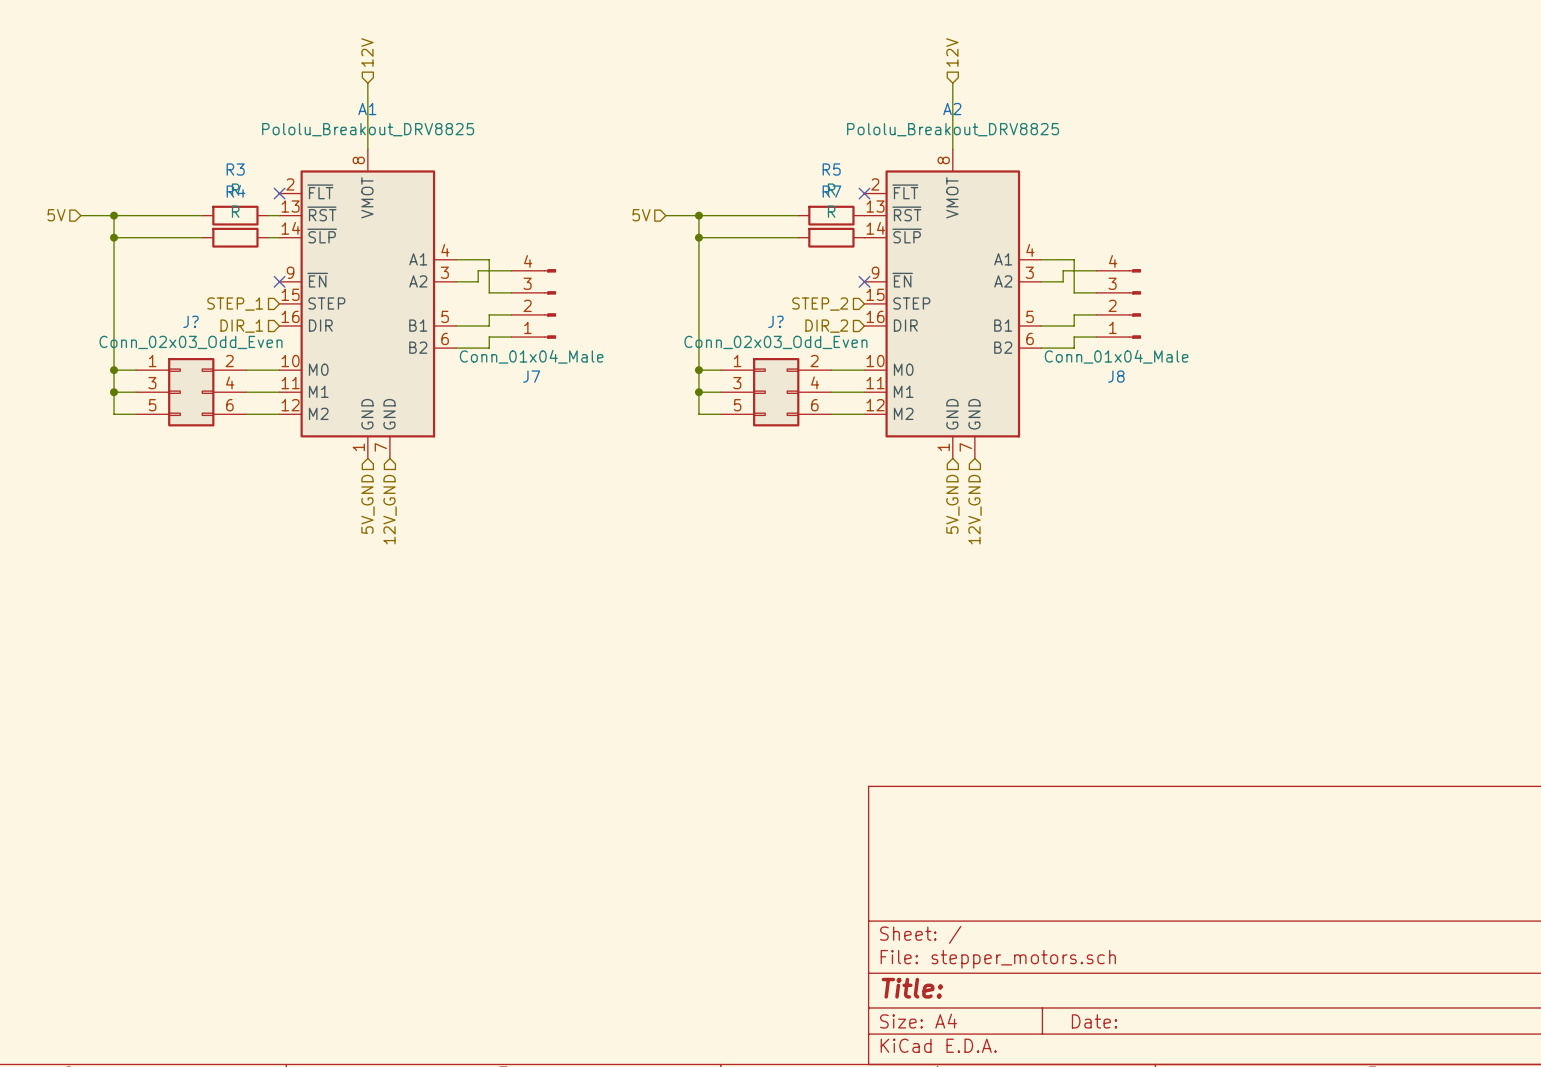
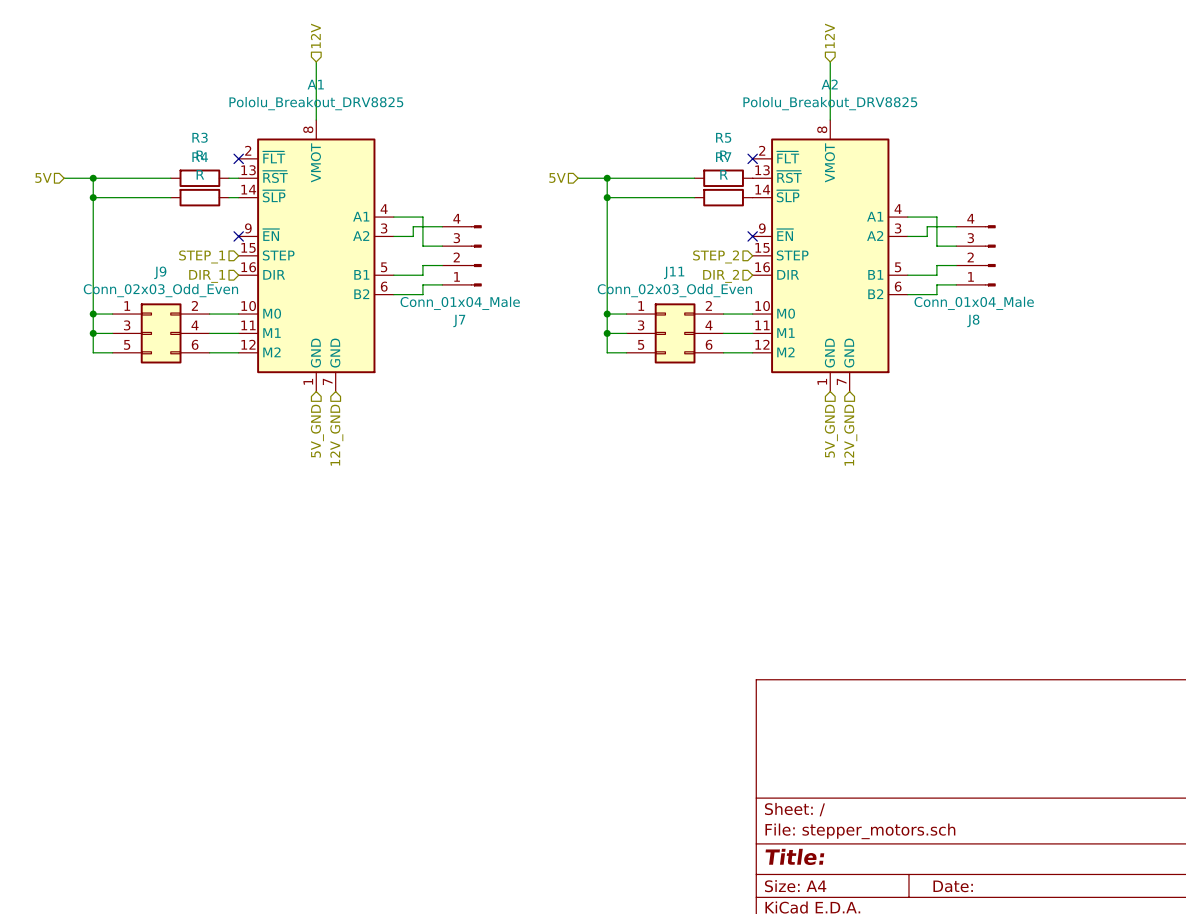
J? name: J? (191, 321) -> J9 (160, 272)
J? name: J? (775, 321) -> J11 (674, 272)

